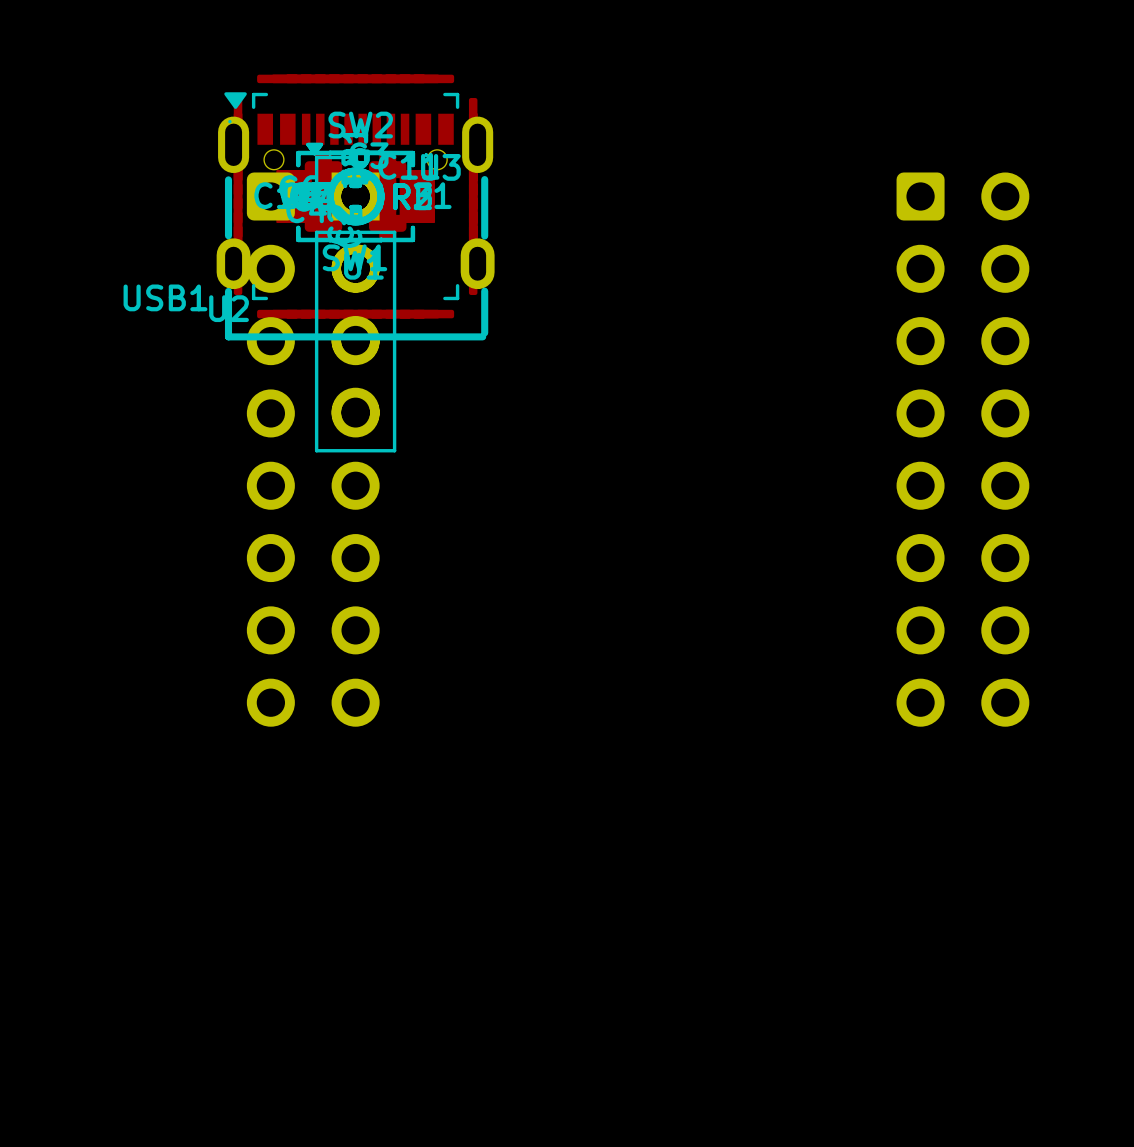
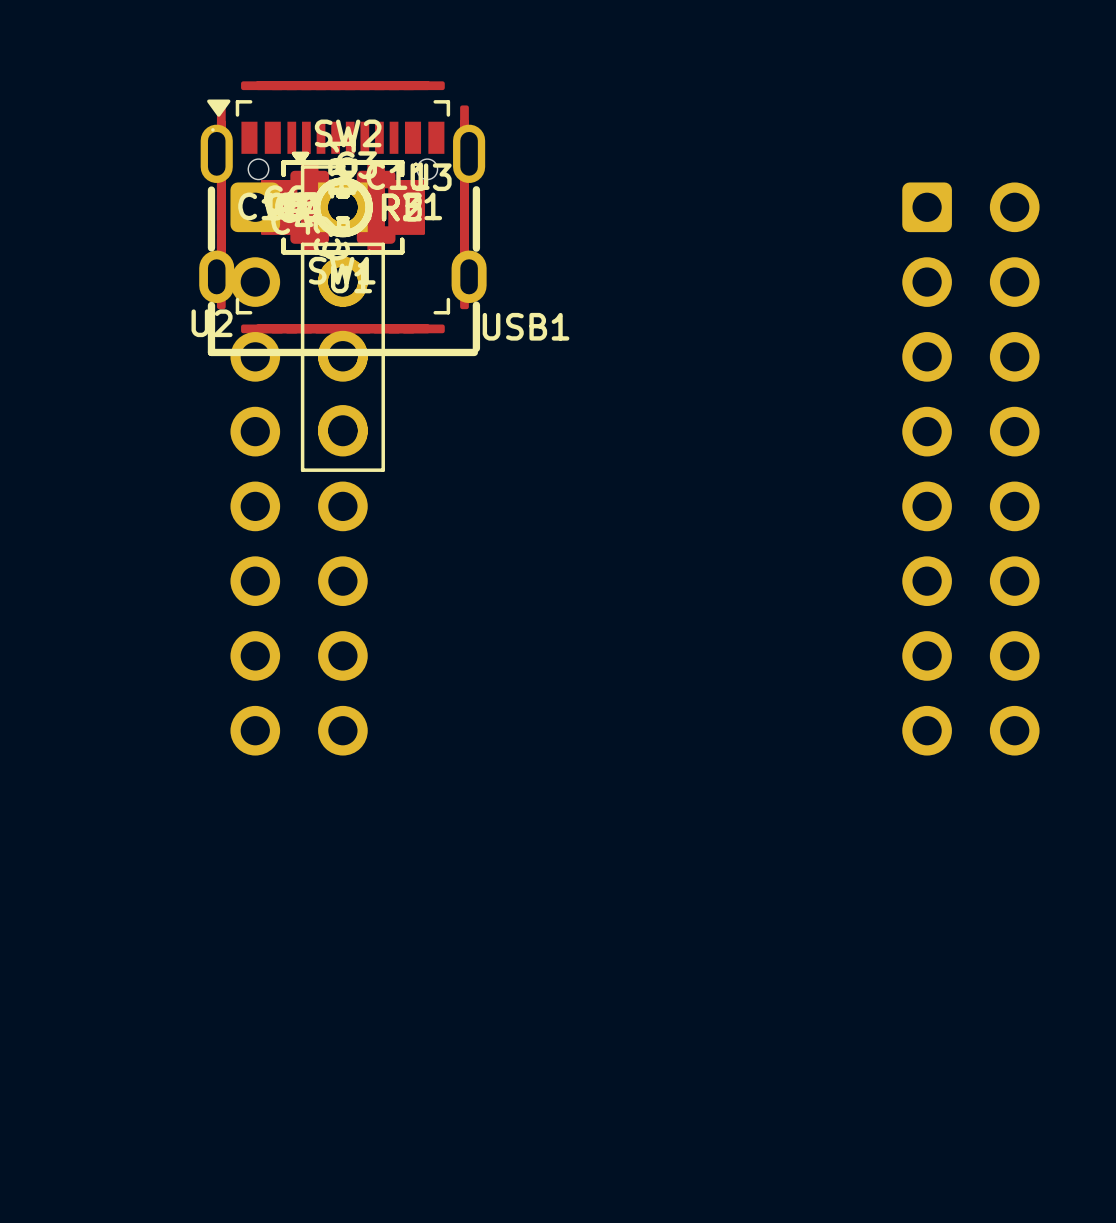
USB1 name position: USB1 (165, 297) -> USB1 (526, 326)

